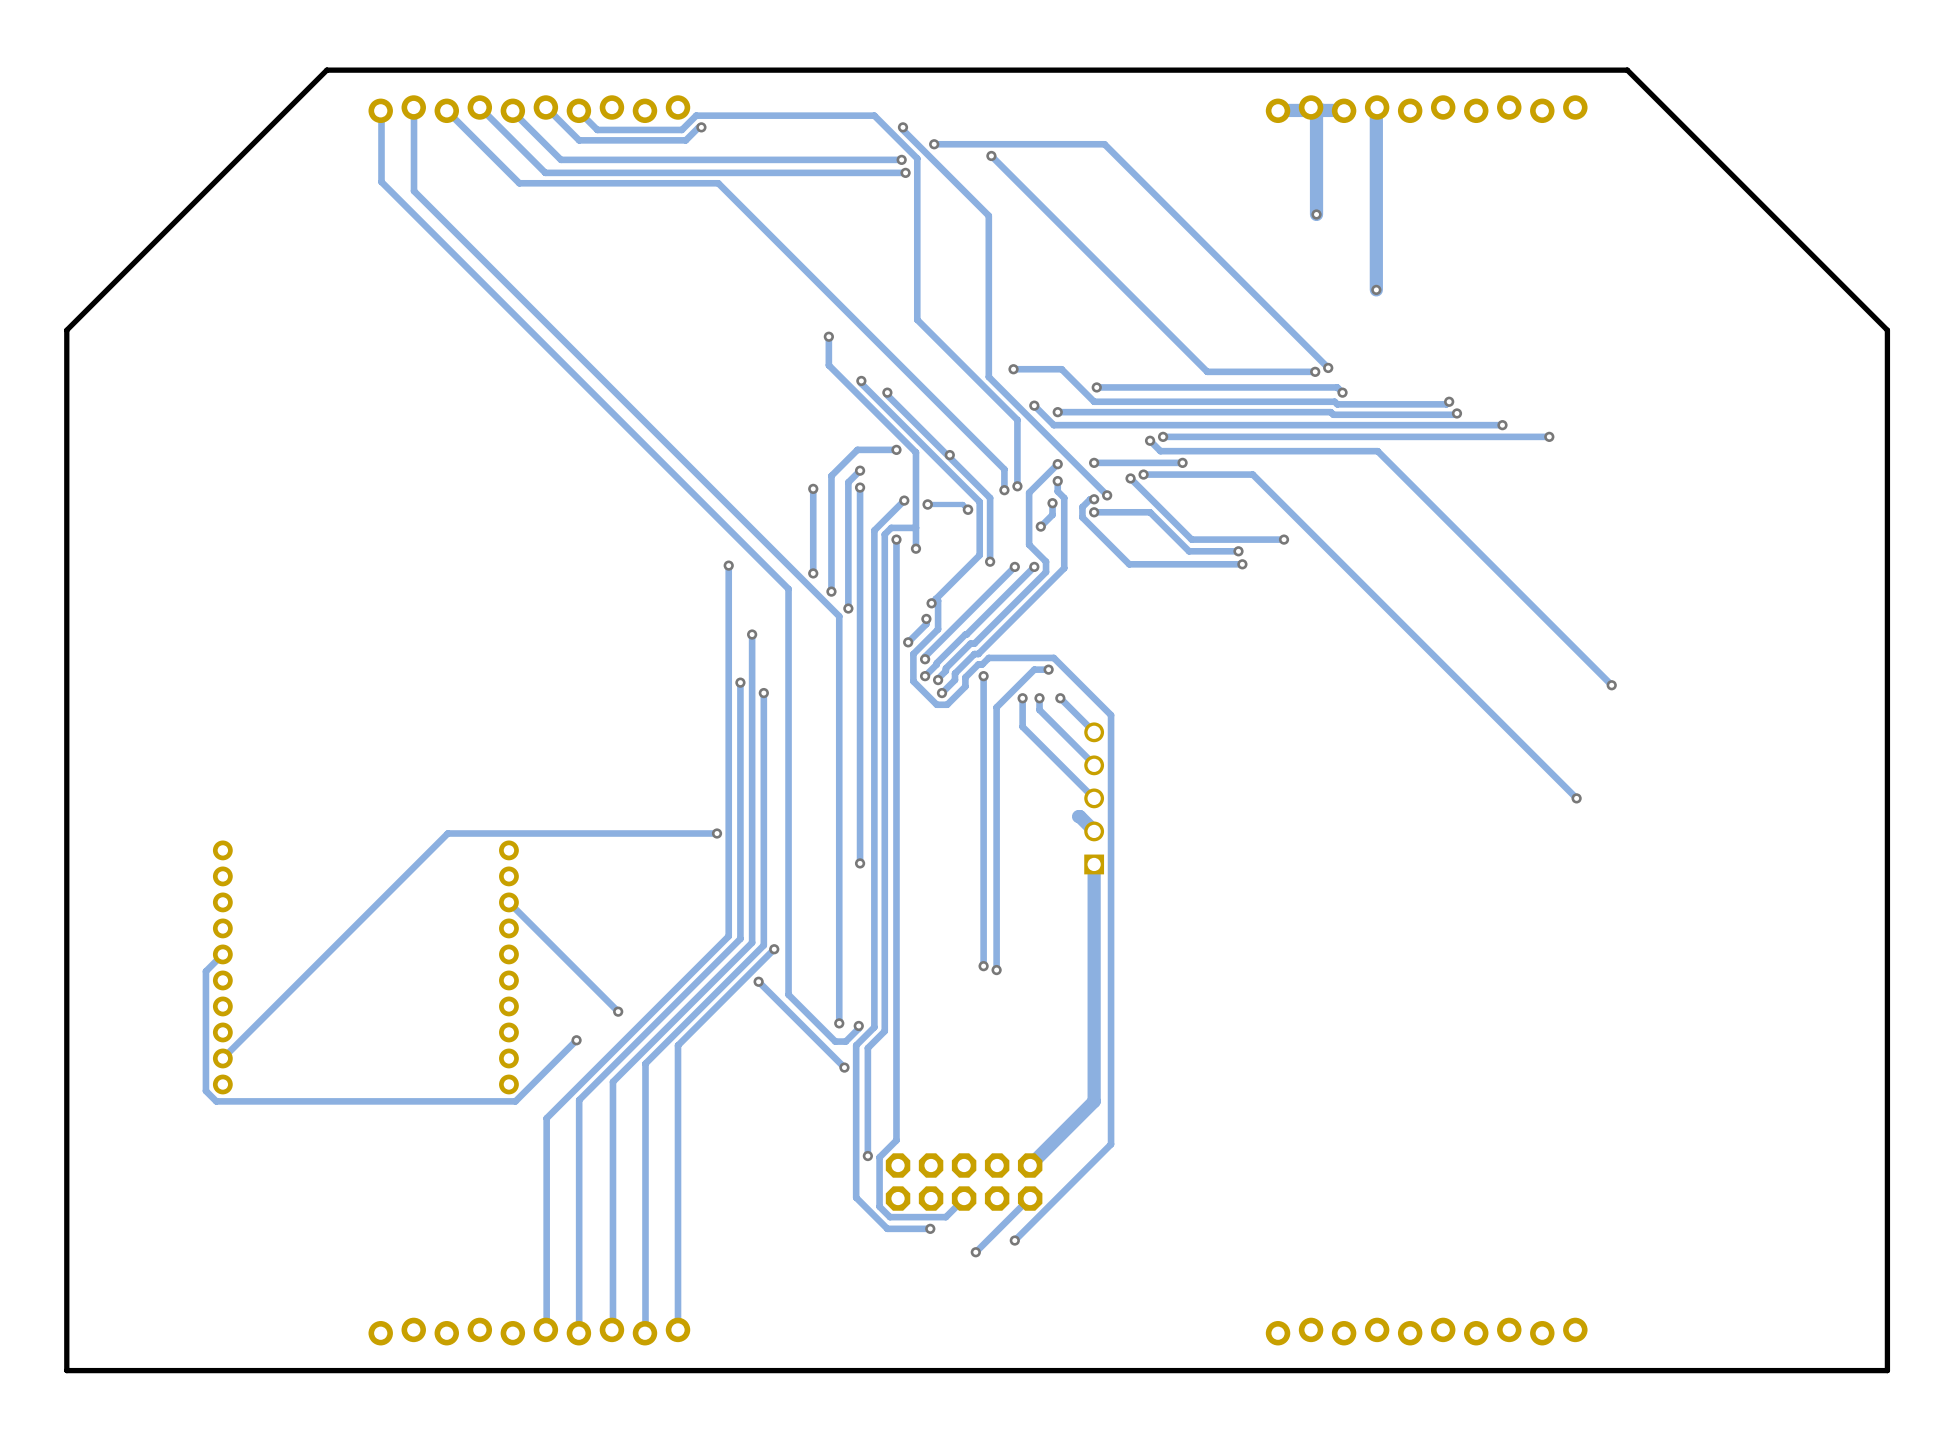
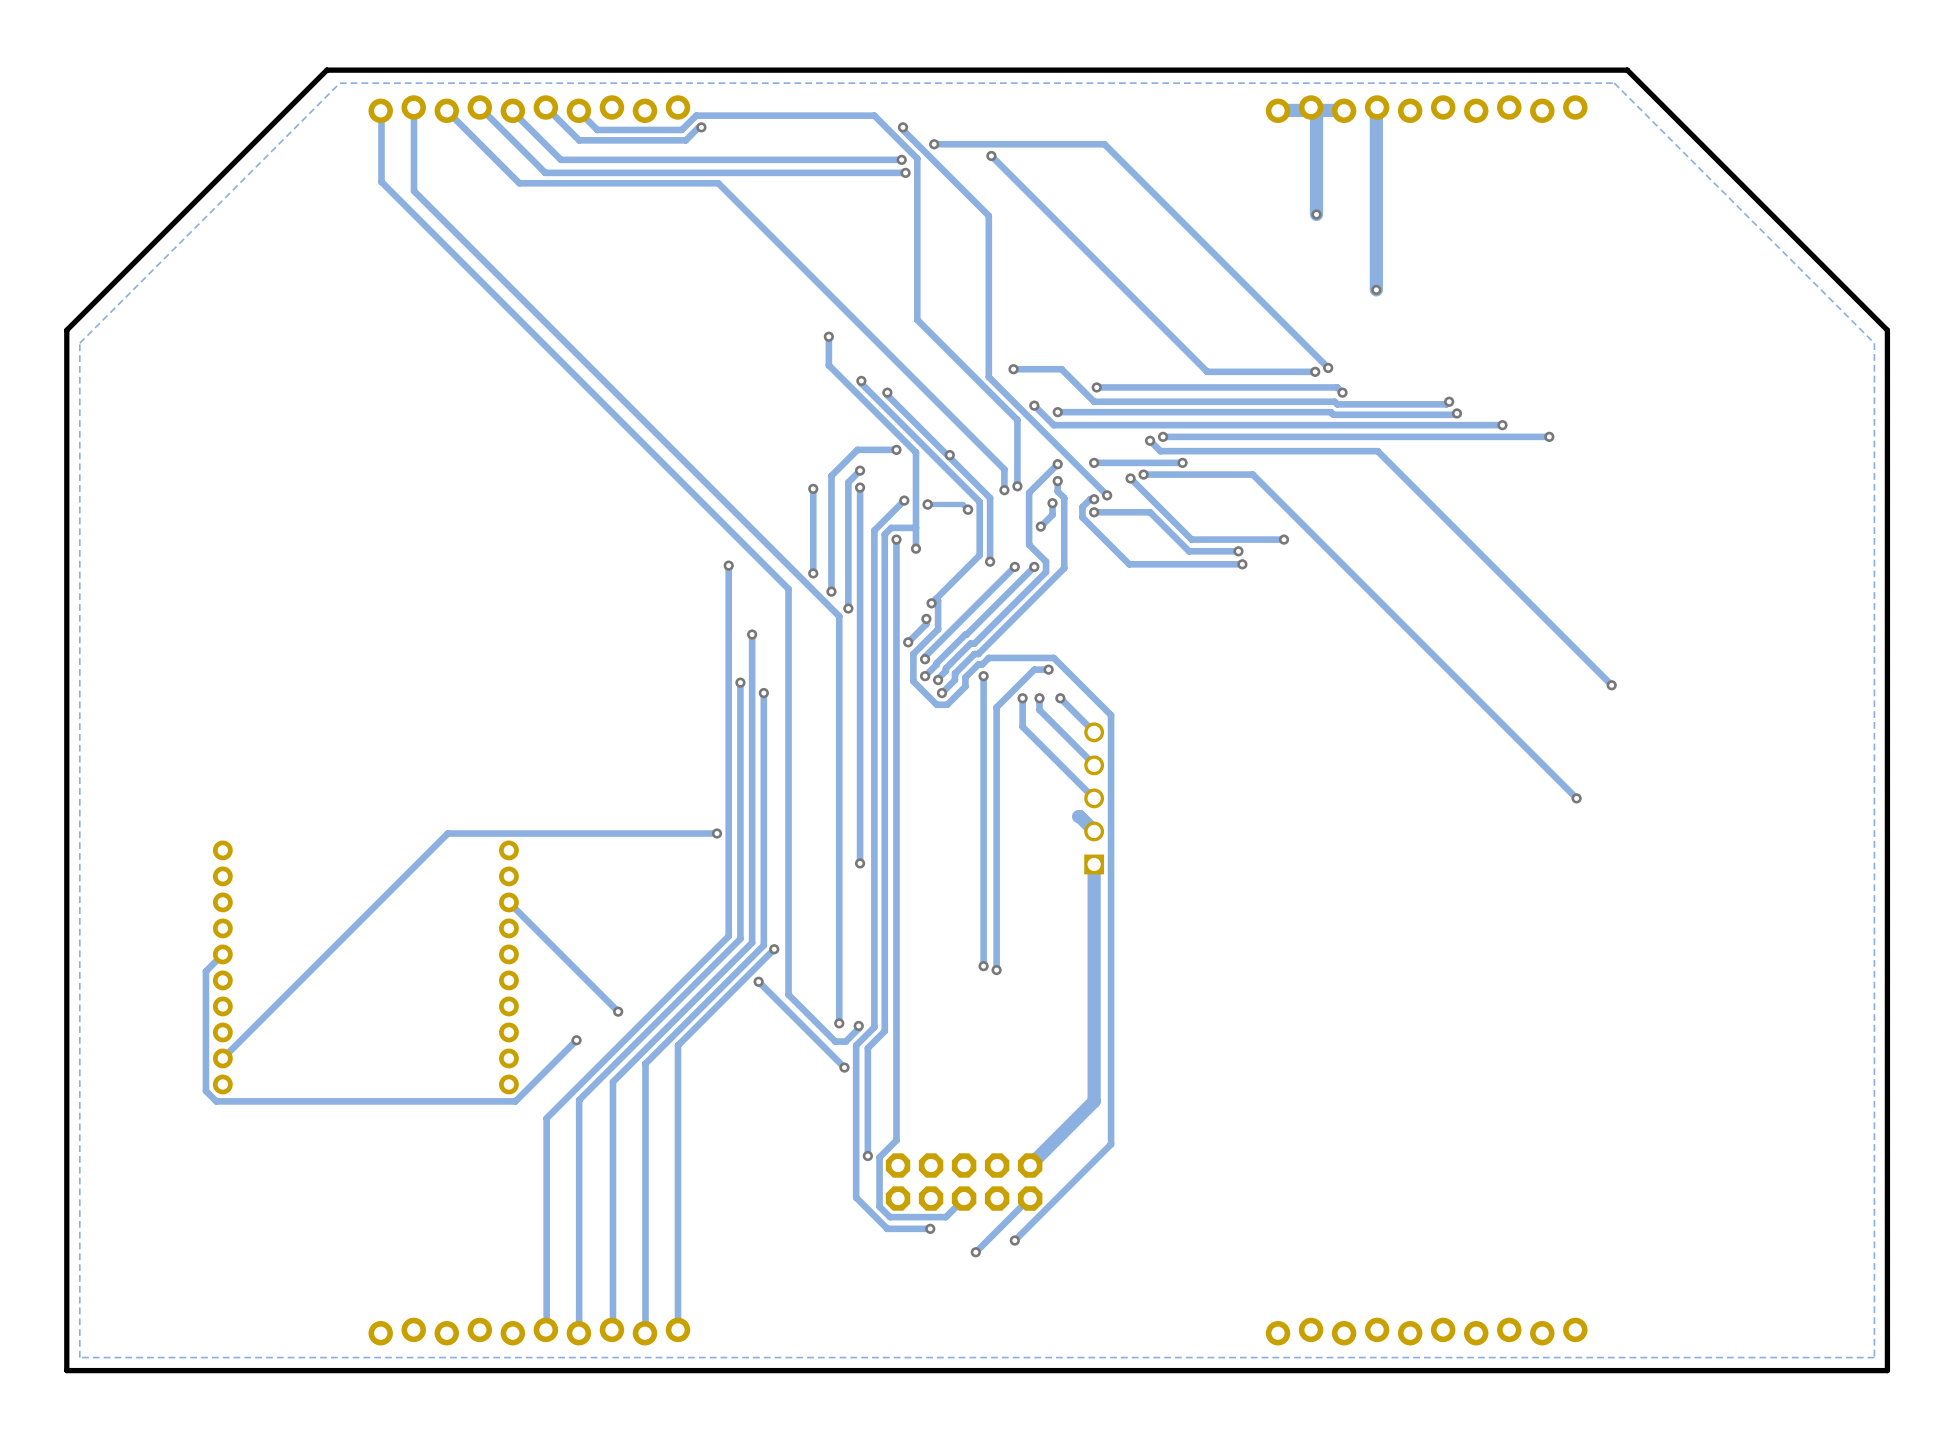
zone outline: none -> (1614, 83) (1874, 343) (1874, 1357) (79, 1357) (79, 343) (339, 83) (1614, 83)

